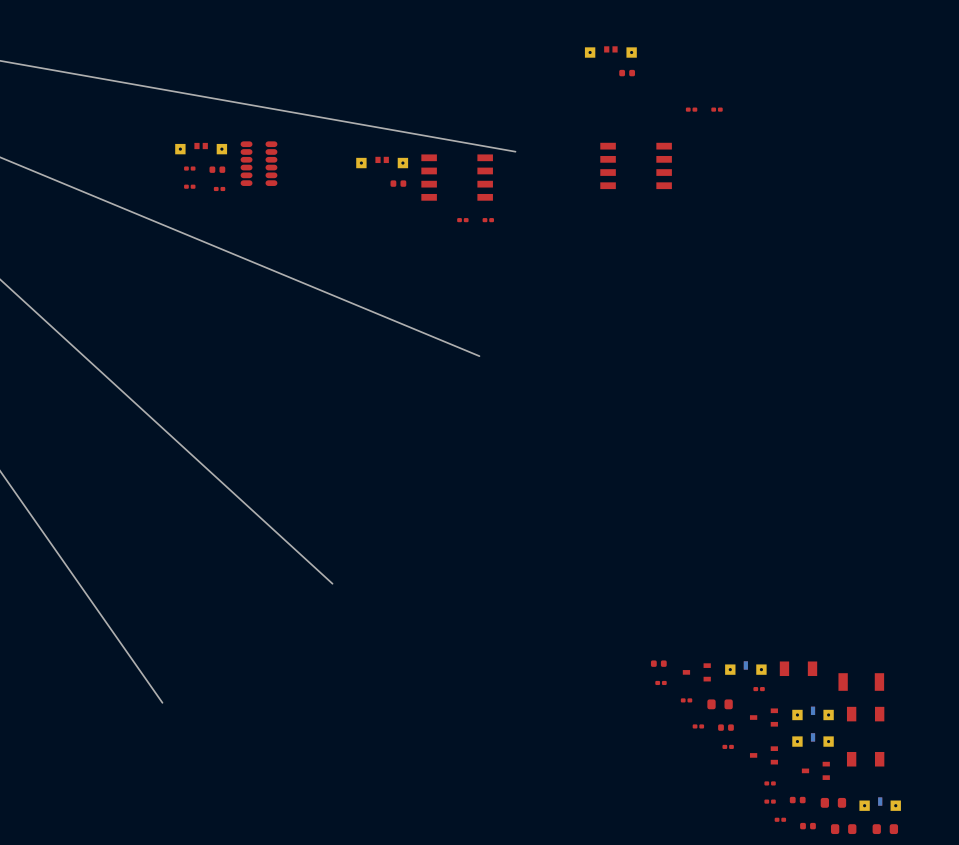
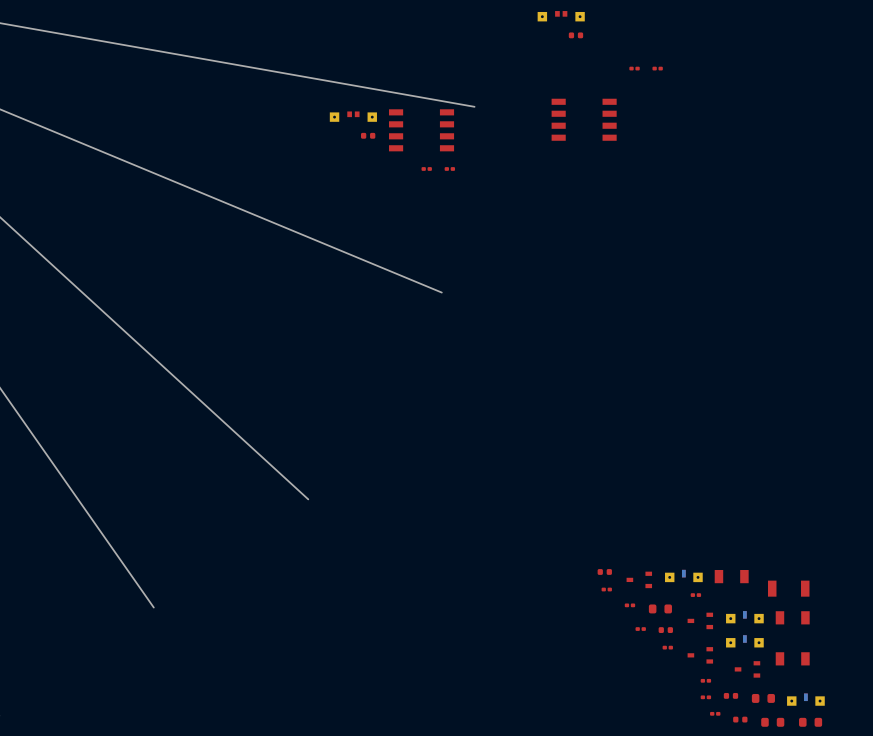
part: (201, 148) -> none
part: (259, 163) -> none
part: (189, 168) -> none
part: (217, 169) -> none
part: (189, 186) -> none
part: (219, 188) -> none

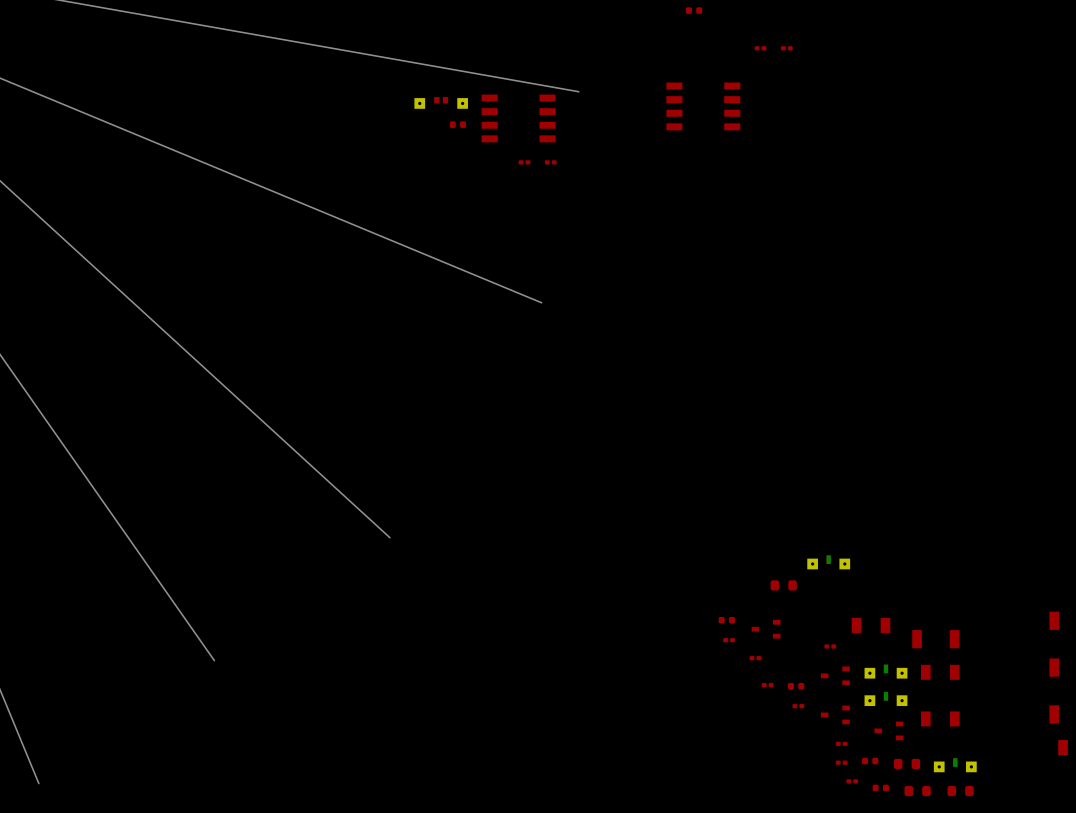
part position: (683, 575) -> (828, 562)
part position: (660, 608) -> (783, 585)

